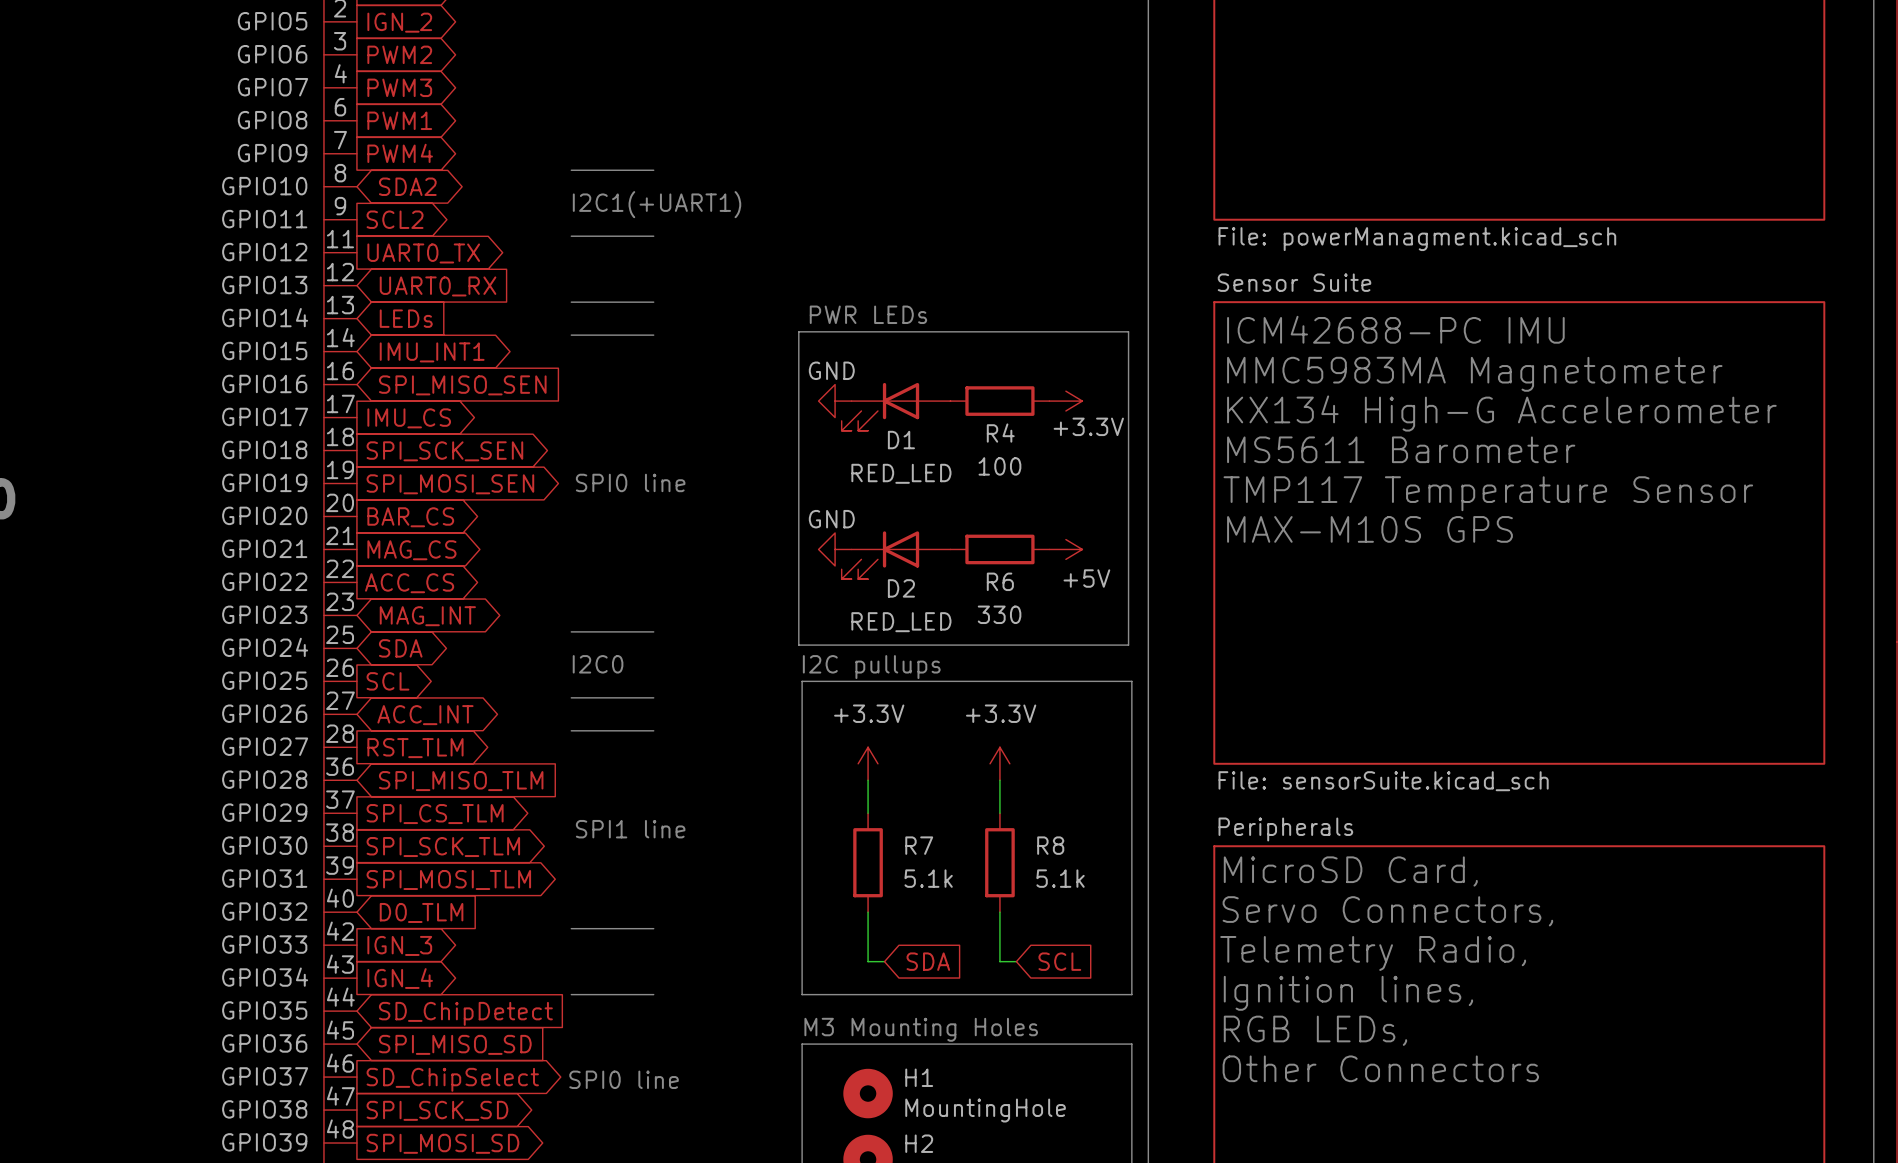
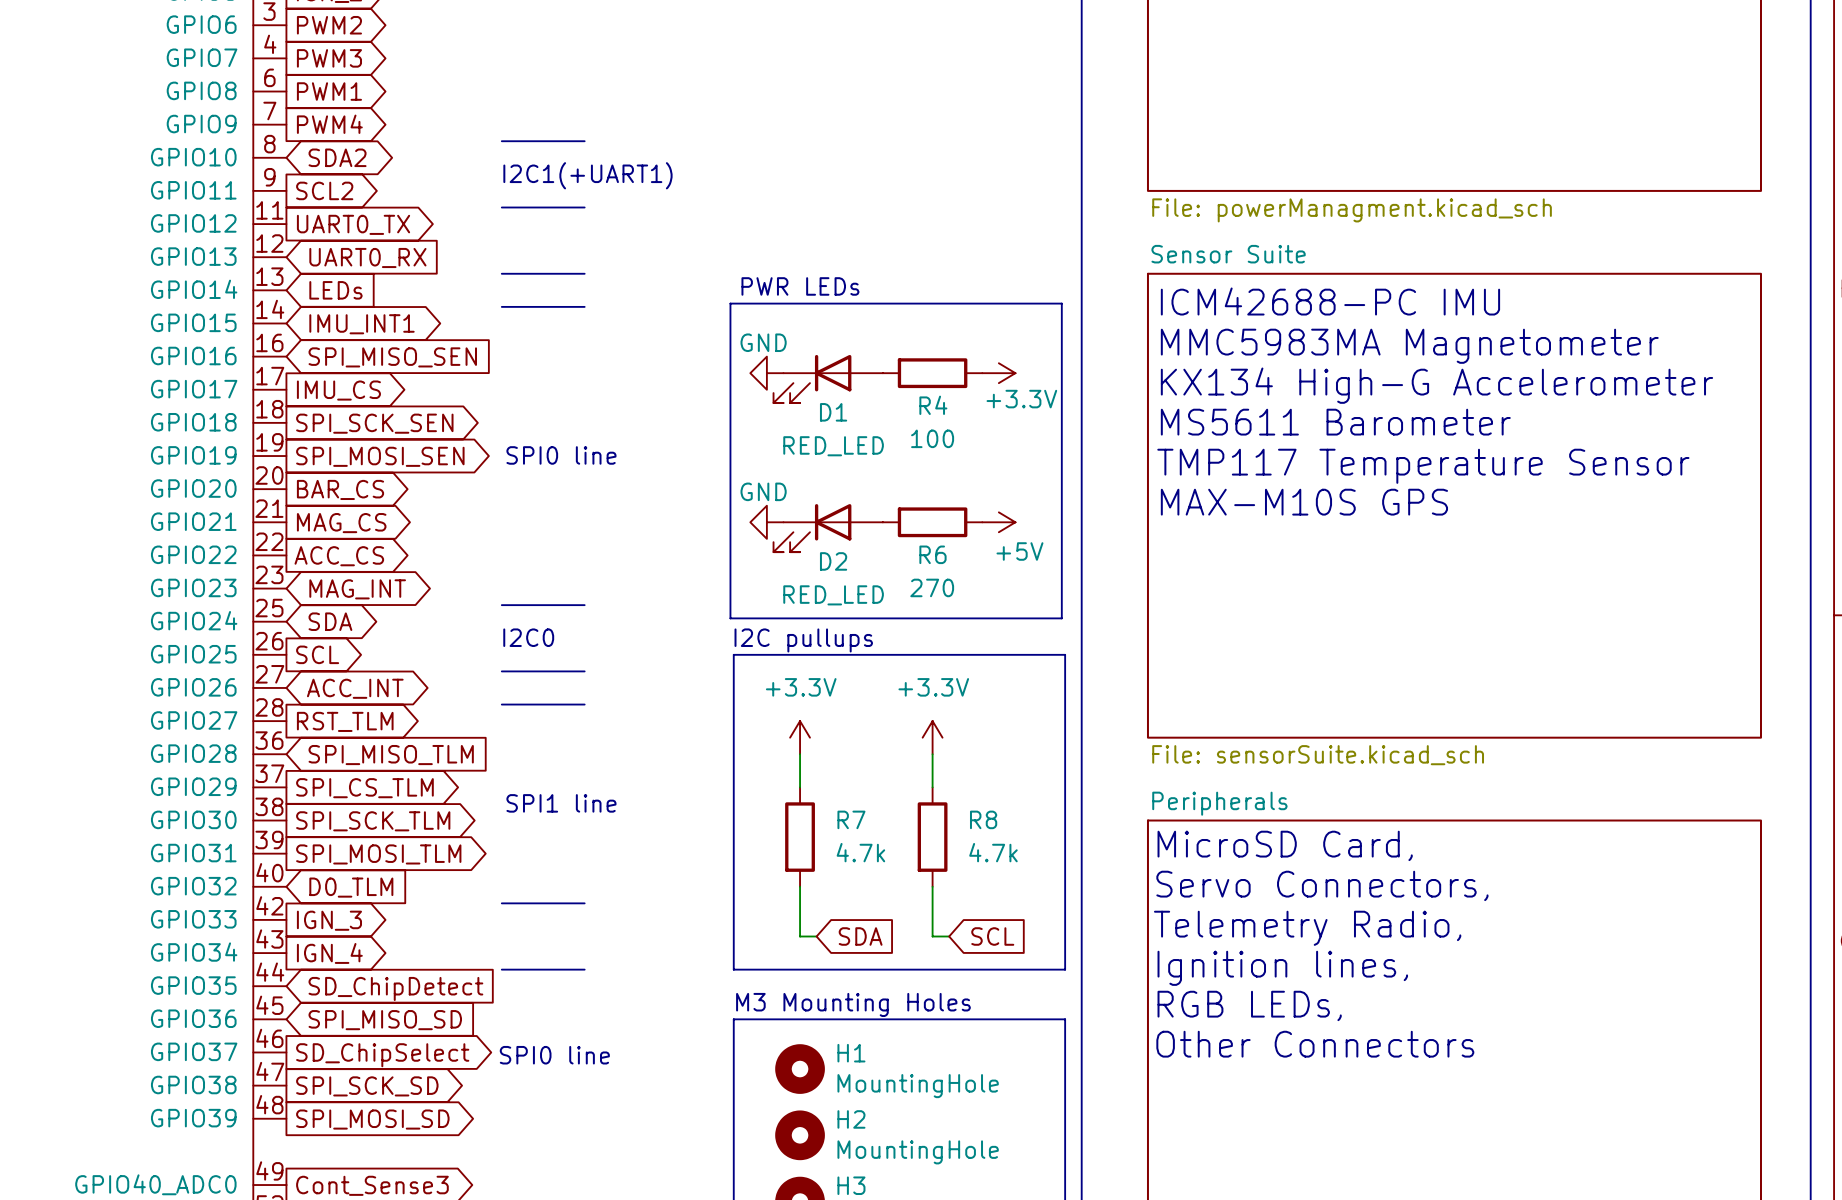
R6 value: 330 (999, 614) -> 270 (932, 587)
R7 value: 5.1k (928, 878) -> 4.7k (860, 852)
R8 value: 5.1k (1060, 878) -> 4.7k (993, 852)

